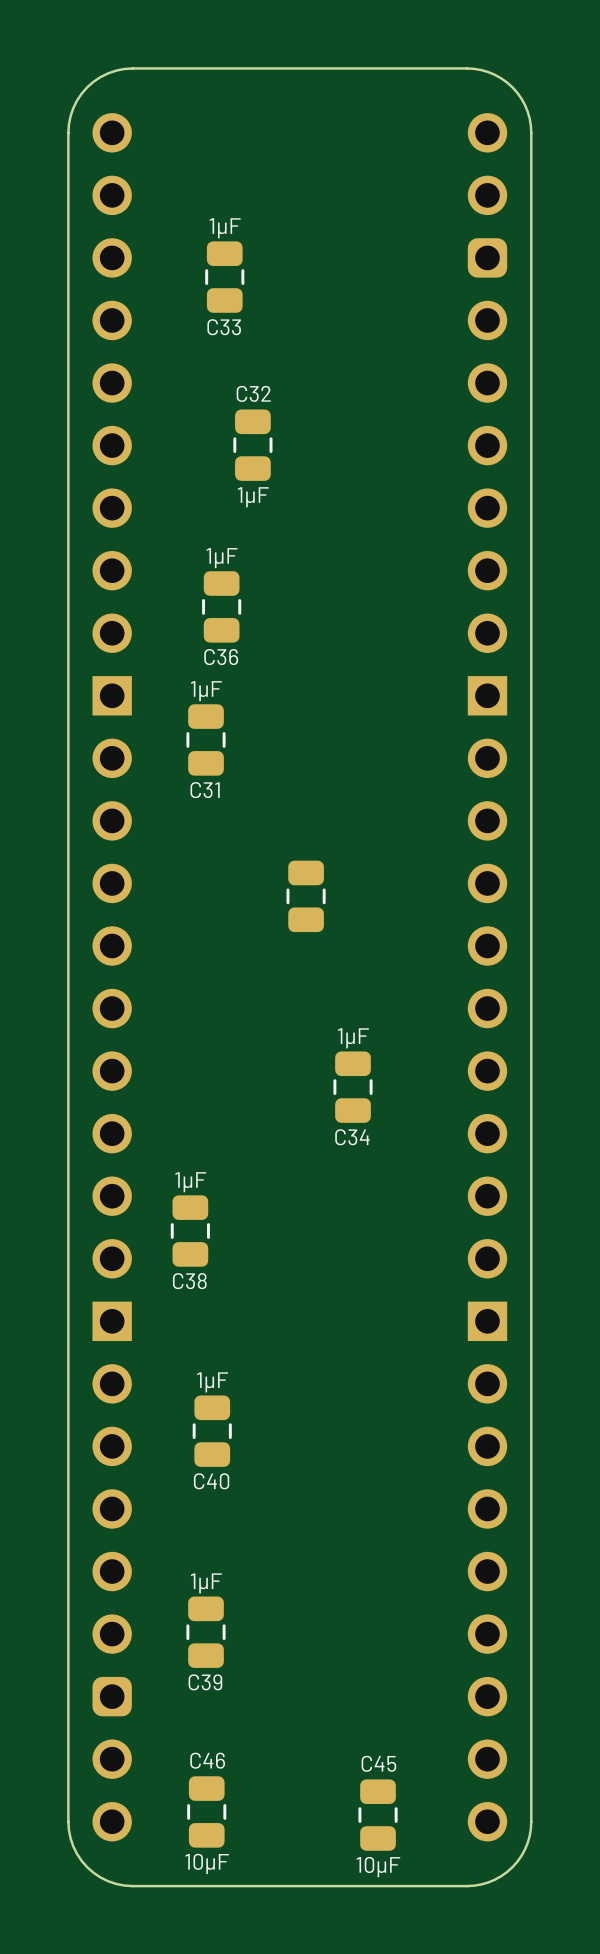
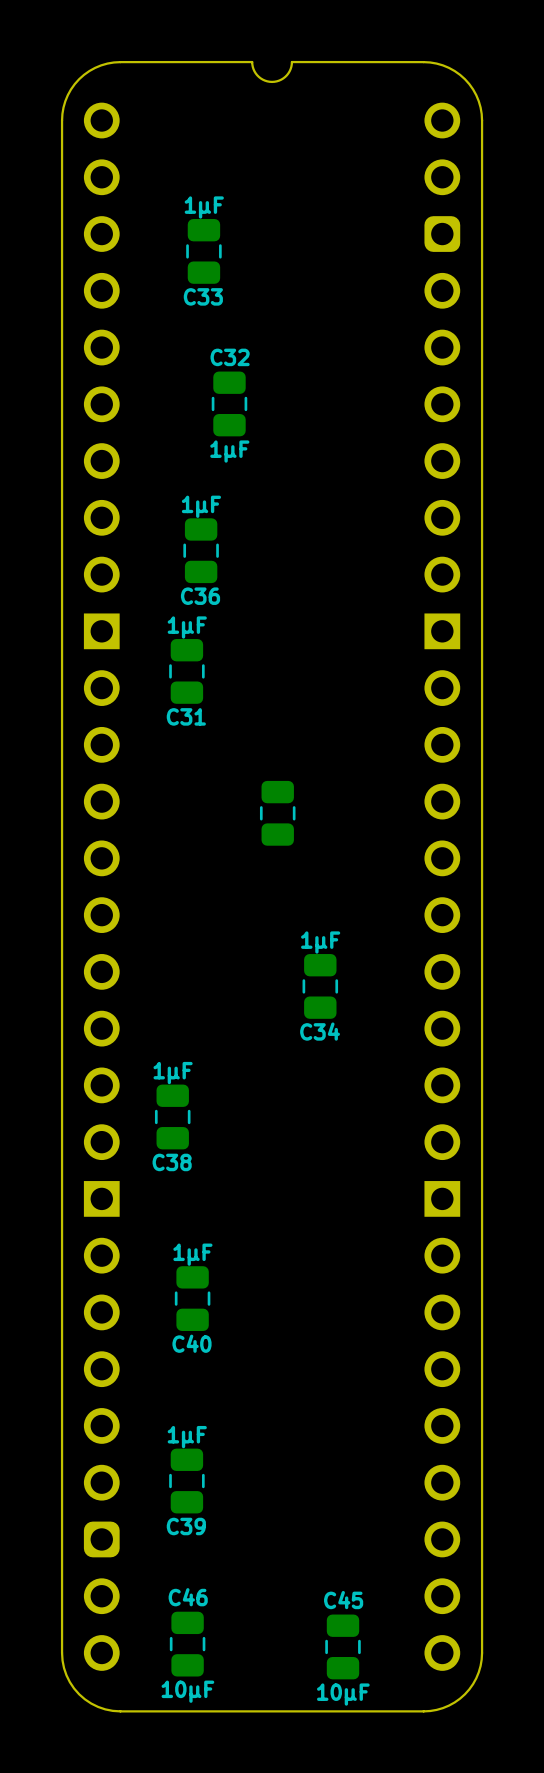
part footprint: [67, 67, 533, 1888] -> [60, 60, 484, 1713]

